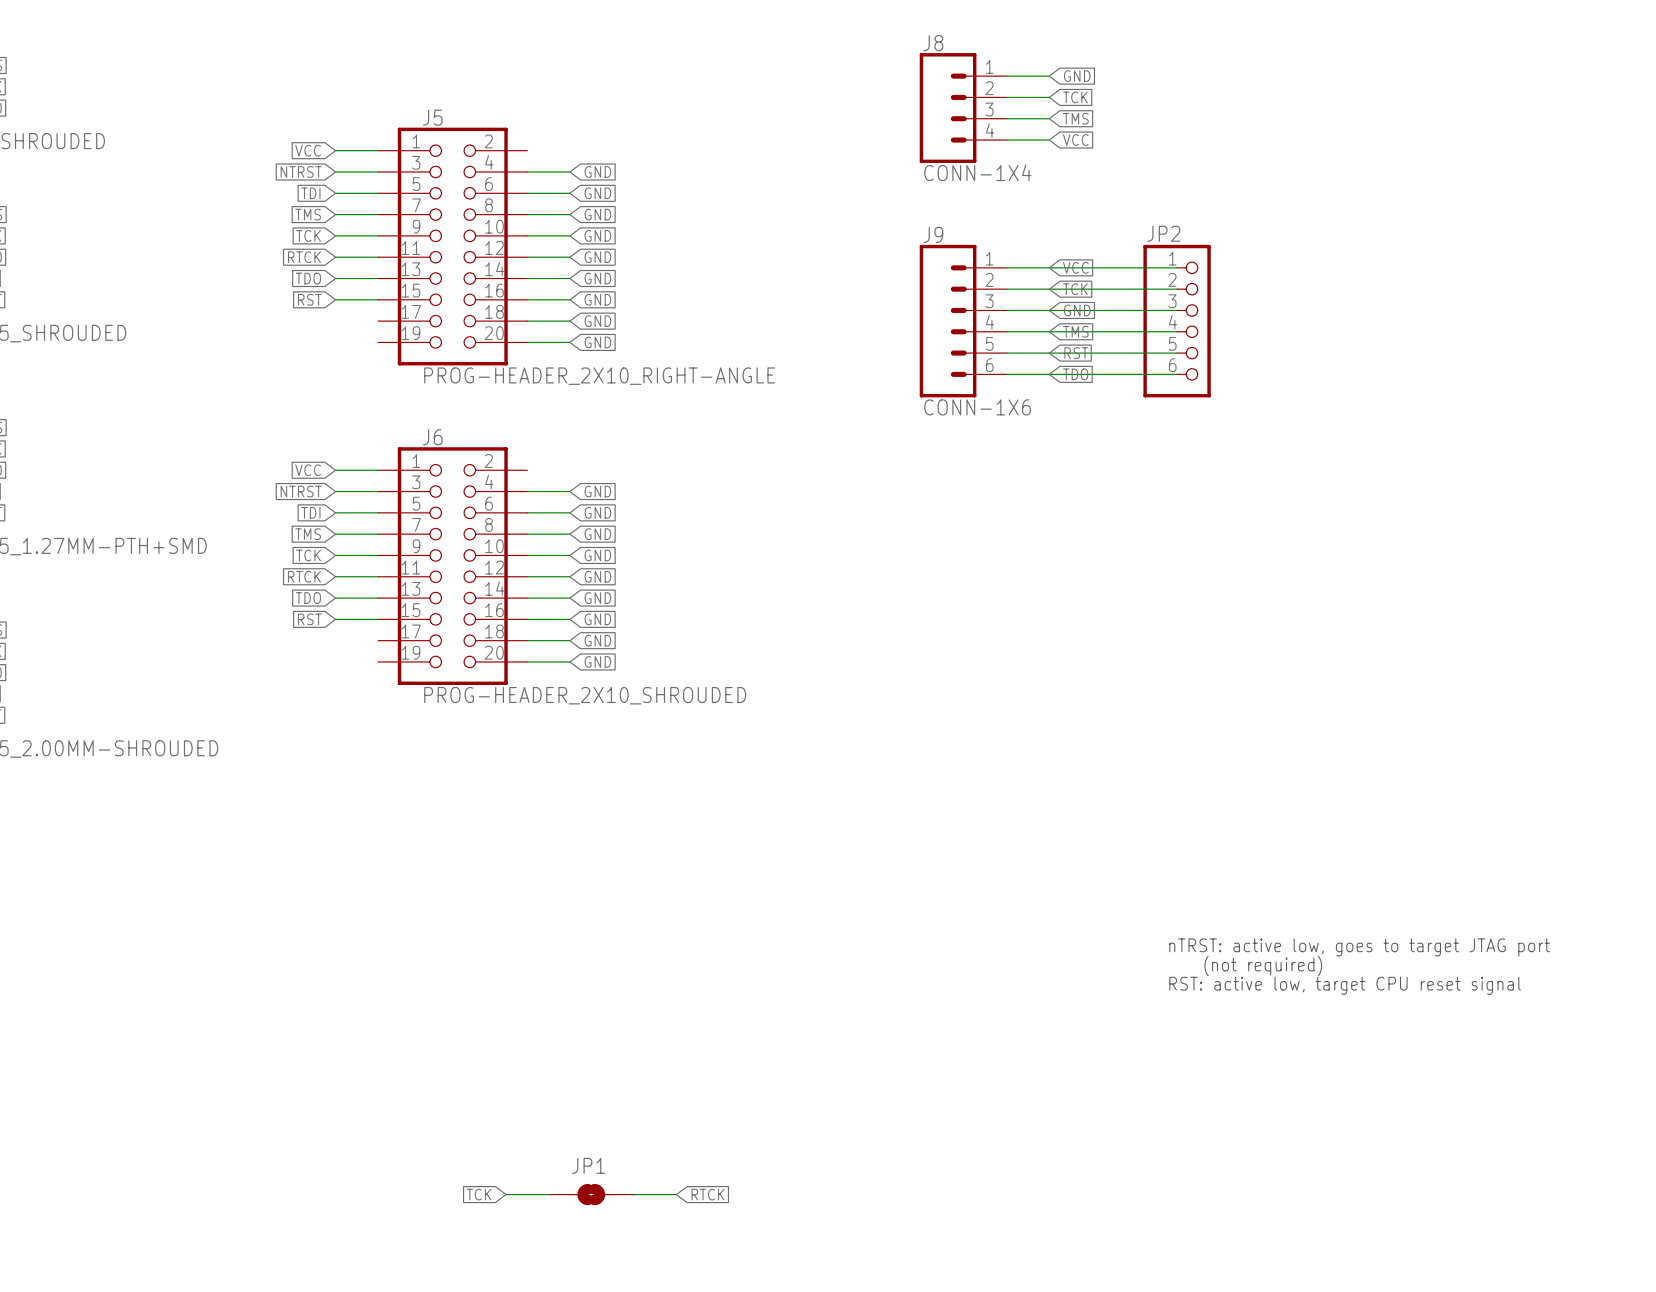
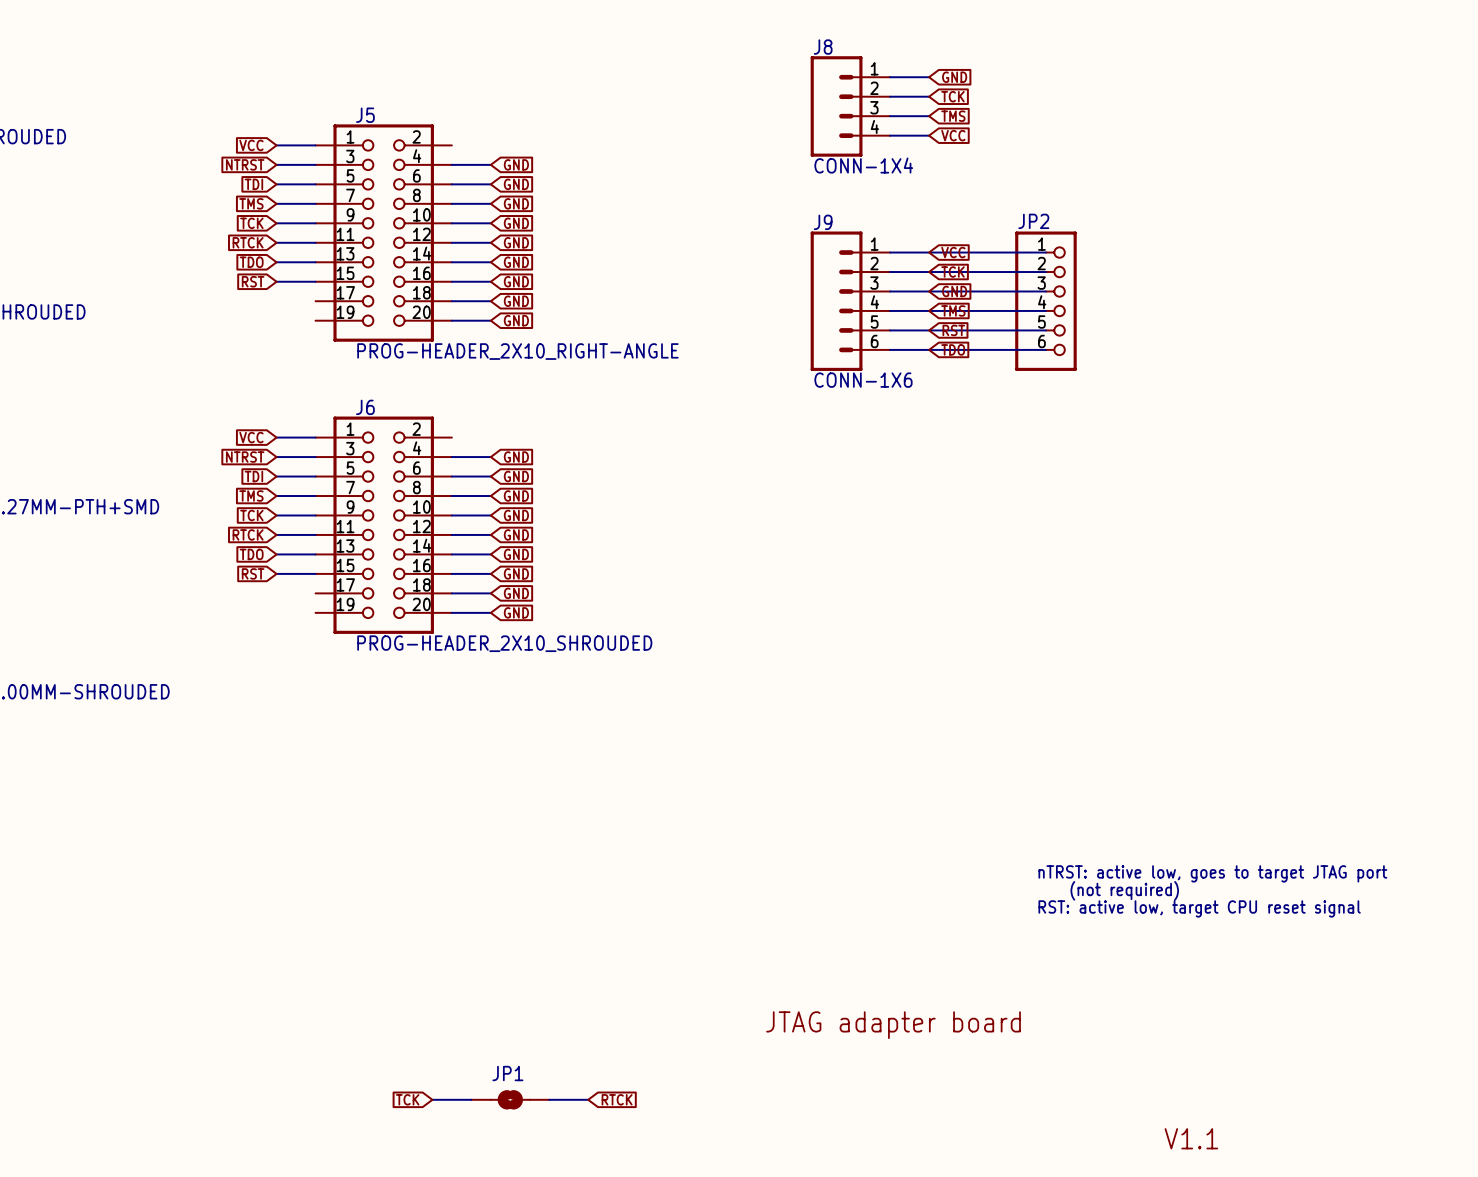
text: none -> JTAG adapter board (893, 1025)
text: none -> V1.1 (1191, 1138)

